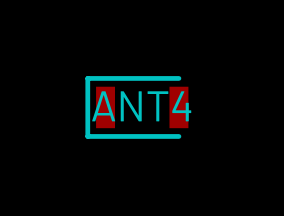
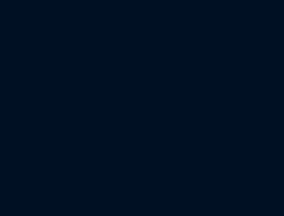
ANT4: (136, 107) -> none

